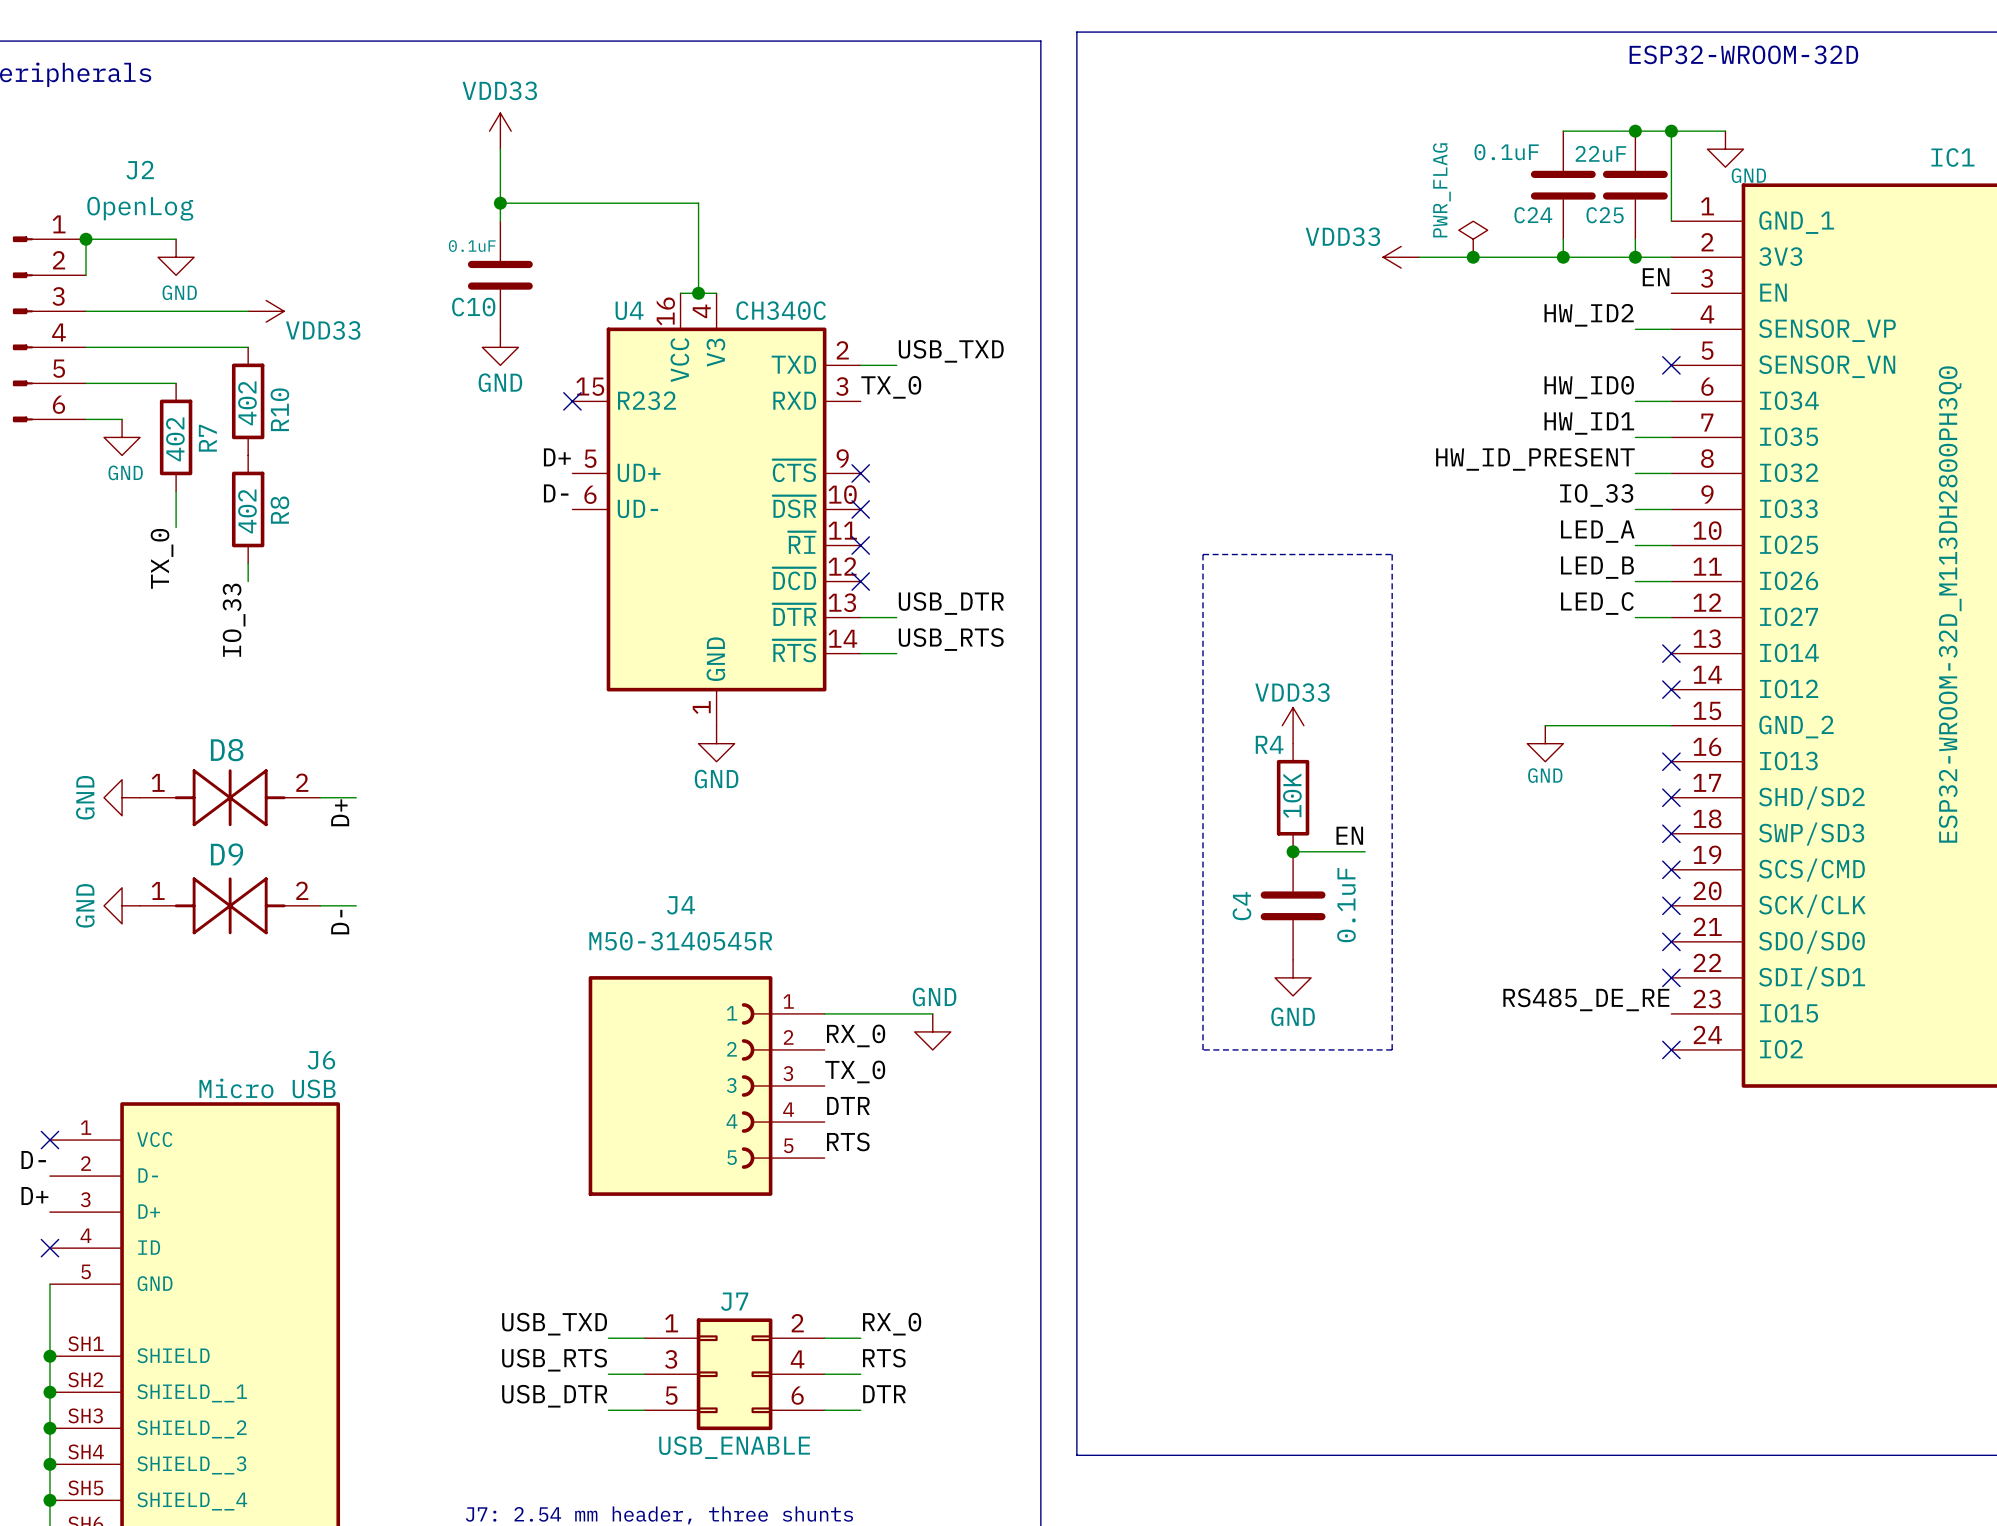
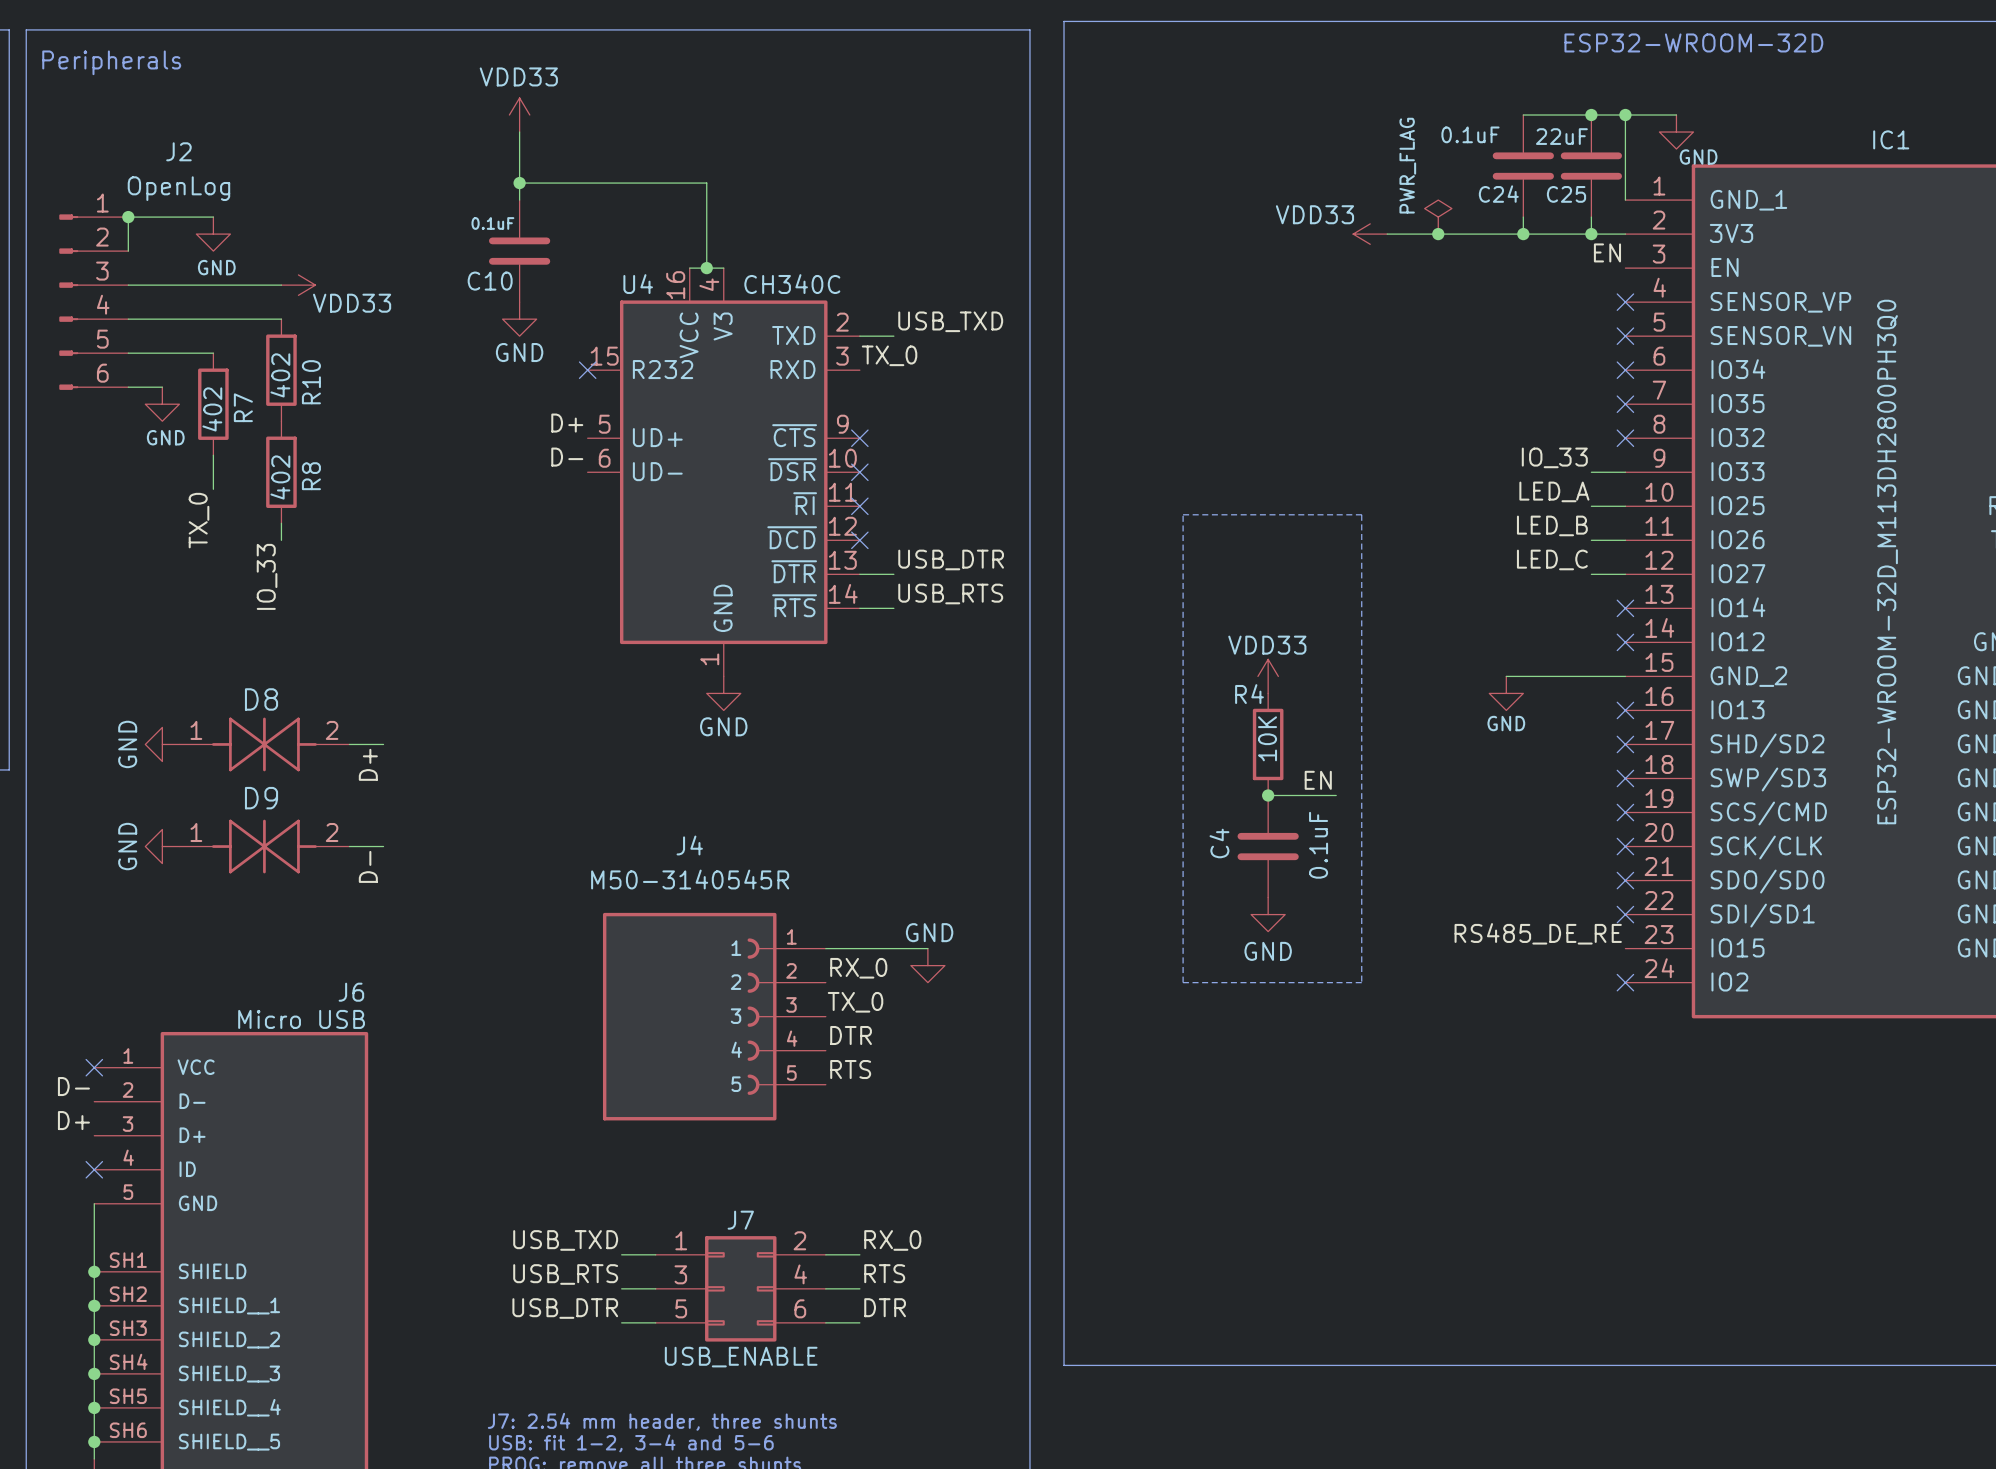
label: HW_ID2 (1589, 315) -> none
wire: (1635, 329) (1671, 329) -> none
no-connect mark: none -> (1625, 302)
label: HW_ID0 (1589, 387) -> none
wire: (1635, 401) (1671, 401) -> none
no-connect mark: none -> (1625, 370)
label: HW_ID1 (1589, 423) -> none
wire: (1635, 437) (1671, 437) -> none
no-connect mark: none -> (1625, 404)
label: HW_ID_PRESENT (1535, 459) -> none
wire: (1635, 473) (1671, 473) -> none
no-connect mark: none -> (1625, 438)

